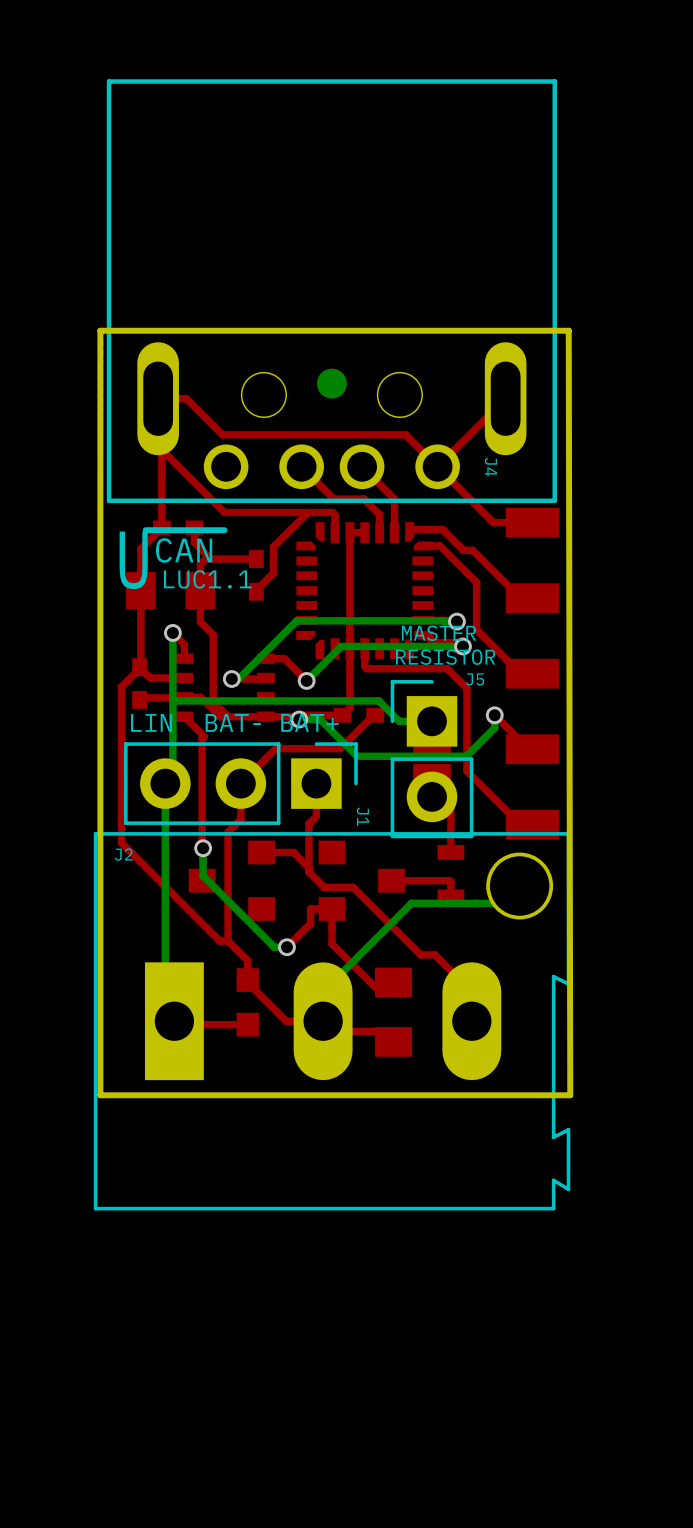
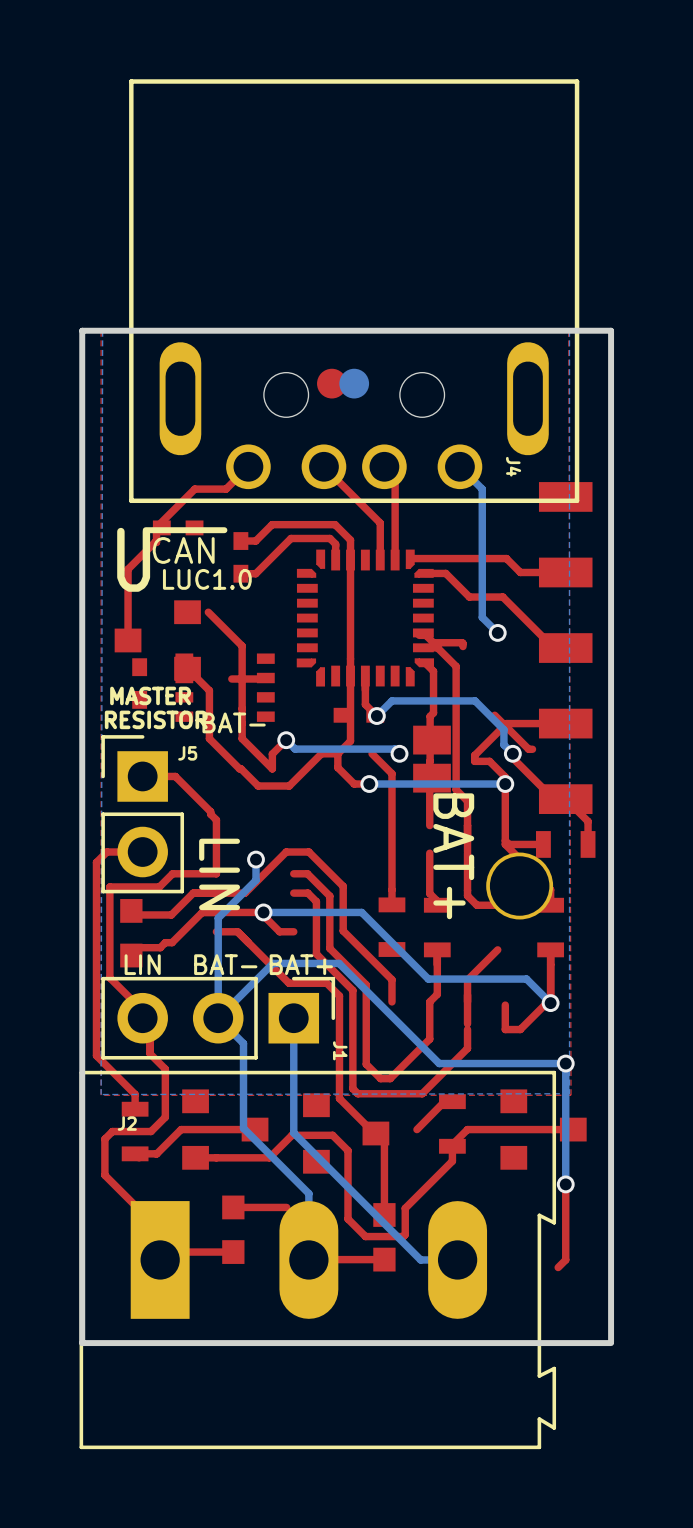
J4 position: (331, 291) -> (354, 291)
board edge: (568, 330) (570, 1095) (100, 1095) (100, 330) -> (611, 1343) (82, 1343) (82, 330) (100, 330)
board edge: none -> (568, 330) (611, 330) (611, 1341)
part position: (331, 383) -> (354, 383)
top track: (158, 398) (186, 398) (222, 434) (405, 434) (493, 522) (532, 522) -> none
top track: (158, 398) (158, 446) (224, 512) (332, 512) (335, 514) (335, 532) -> none
top track: (158, 398) (161, 402) (161, 527) (140, 548) (139, 667) -> none
top track: (505, 398) (437, 466) -> none
top track: none -> (248, 466) (226, 489) (194, 489) (156, 527) (156, 542) (128, 569) (128, 640)
top track: (301, 466) (333, 499) (363, 499) (379, 514) (379, 532) -> none
top track: none -> (323, 466) (380, 523) (380, 561)
top track: (362, 466) (394, 499) (394, 532) -> none
top track: none -> (384, 466) (395, 477) (395, 561)
bottom track: none -> (459, 466) (482, 489) (482, 617) (497, 632)
top track: (307, 512) (273, 546) (273, 573) (256, 591) -> none
part footprint: [296, 522, 434, 660] -> [296, 549, 435, 687]
top track: (194, 527) (194, 542) (210, 559) -> none
top track: (364, 532) (349, 532) (349, 707) (342, 715) (303, 715) (299, 719) (296, 716) (220, 716) (200, 697) (141, 697) (139, 699) -> none
top track: (407, 538) (409, 529) (442, 529) (463, 550) (472, 550) (520, 598) (532, 598) -> none
top track: none -> (240, 541) (255, 541) (272, 524) (335, 524) (350, 540) (350, 741) (337, 753)
top track: (416, 547) (440, 545) (476, 582) (476, 629) (520, 673) (532, 673) -> none
top track: none -> (410, 558) (506, 558) (520, 572) (565, 572)
top track: (256, 559) (205, 559) (200, 564) (200, 621) (213, 634) (213, 701) (228, 716) -> none
top track: none -> (335, 561) (335, 544) (330, 538) (291, 538) (255, 573) (240, 573)
top track: none -> (424, 573) (445, 573) (469, 597) (502, 597) (553, 648) (565, 648)
part position: (256, 575) -> (240, 557)
text: LUC1.1 (207, 579) -> LUC1.0 (207, 579)
part: (170, 590) -> none
top track: none -> (208, 612) (242, 646) (242, 738) (272, 768) (272, 754) (286, 740)
bottom track: (456, 621) (296, 620) (238, 679) (231, 679) -> none
via: (456, 621) -> none
top track: (172, 632) (184, 644) (184, 658) -> none
bottom track: (172, 632) (172, 776) (165, 783) (165, 1012) (174, 1021) -> none
via: (172, 632) -> none
via: none -> (497, 632)
text position: MASTER (439, 633) -> MASTER (150, 695)
part: none -> (157, 640)
bottom track: (462, 646) (341, 646) (306, 680) -> none
via: (462, 646) -> none
top track: none -> (421, 647) (437, 647) (456, 666) (456, 789) (467, 801) (467, 852)
top track: (364, 648) (364, 666) (367, 668) (447, 668) (466, 688) (466, 771) (520, 824) (532, 824) -> none
text position: RESISTOR (445, 657) -> RESISTOR (156, 719)
top track: (265, 658) (284, 658) (306, 680) -> none
top track: none -> (424, 662) (433, 671) (433, 712) (430, 716) (430, 761)
top track: (139, 667) (121, 686) (121, 842) (219, 941) (228, 941) -> none
top track: (139, 667) (150, 678) (184, 678) -> none
top track: none -> (187, 668) (209, 690) (209, 738) (258, 786) (289, 786) (321, 753) (337, 753)
part position: (532, 673) -> (565, 648)
top track: none -> (365, 674) (365, 704) (376, 716)
via: (231, 679) -> none
J5 name position: J5 (475, 679) -> J5 (187, 753)
via: (306, 680) -> none
bottom track: (172, 700) (378, 700) (399, 721) (432, 721) -> none
top track: (375, 715) (340, 748) (275, 748) (240, 783) (240, 819) (228, 832) (228, 941) -> none
bottom track: (494, 715) (494, 727) (466, 756) (357, 756) (320, 719) (299, 719) -> none
via: (494, 715) -> none
top track: (184, 716) (204, 736) (202, 738) (202, 880) -> none
bottom track: none -> (376, 716) (391, 700) (475, 700) (503, 729) (503, 744) (512, 753)
via: none -> (376, 716)
via position: (299, 719) -> (286, 740)
text: LIN (151, 722) -> none
text: BAT+ (309, 722) -> none
top track: none -> (577, 723) (506, 723) (474, 755) (474, 761) (489, 761) (505, 777) (505, 844) (550, 889) (550, 905)
bottom track: none -> (286, 740) (295, 749) (394, 749) (399, 753)
top track: none -> (337, 753) (337, 767) (354, 784) (369, 784)
top track: none -> (372, 753) (391, 773) (391, 904)
via: none -> (399, 753)
top track: none -> (512, 753) (512, 758) (553, 799) (565, 799) (588, 821) (588, 844)
via: none -> (512, 753)
J5 position: (432, 759) -> (142, 814)
top track: none -> (429, 761) (429, 825)
top track: none -> (142, 776) (175, 776) (210, 811) (216, 820) (216, 873) (172, 873) (159, 886) (109, 886) (109, 977) (150, 1018) (150, 1053) (165, 1069) (165, 1117) (151, 1131) (112, 1131) (104, 1139) (104, 1175) (160, 1230) (160, 1259) (168, 1252) (233, 1252)
J1 position: (240, 783) -> (218, 1018)
top track: (316, 783) (316, 816) (308, 823) (308, 872) (324, 887) (353, 887) (420, 954) (434, 954) (471, 991) (471, 1021) -> none
via: none -> (369, 784)
bottom track: none -> (505, 784) (369, 784)
via: none -> (505, 784)
top track: (444, 796) (450, 802) (450, 852) -> none
top track: none -> (505, 840) (509, 844) (543, 844)
part: none -> (565, 844)
text: none -> BAT+ (453, 856)
bottom track: (203, 848) (203, 875) (274, 947) (286, 947) -> none
via: (203, 848) -> none
top track: none -> (142, 852) (106, 852) (96, 862) (96, 1055) (135, 1094) (135, 1109)
top track: (261, 852) (293, 852) (308, 867) -> none
top track: none -> (429, 853) (429, 893) (437, 901) (437, 905)
top track: none -> (467, 853) (467, 895) (476, 905) (497, 905)
J2 name position: J2 (123, 854) -> J2 (127, 1123)
bottom track: none -> (256, 859) (256, 880) (218, 918) (218, 1018)
via: none -> (256, 859)
top track: none -> (293, 873) (307, 873) (329, 896) (329, 948) (366, 984) (366, 1064) (380, 1078) (390, 1078) (429, 1039) (429, 1001) (437, 994) (437, 949)
part: (450, 874) -> none
text: none -> LIN (219, 874)
part: (231, 880) -> none
part: (361, 880) -> none
top track: (391, 880) (449, 880) (450, 896) -> none
top track: none -> (293, 893) (307, 893) (316, 901) (316, 953) (352, 990) (352, 1088) (357, 1093) (422, 1093) (467, 1048) (467, 1029)
bottom track: (523, 903) (411, 903) (323, 991) (323, 1021) -> none
top track: none -> (127, 911) (131, 914) (171, 914) (193, 893) (245, 893) (286, 852) (308, 852) (343, 886) (343, 930) (391, 979) (391, 1001)
bottom track: none -> (263, 912) (361, 912) (428, 979) (526, 979) (550, 1003)
part: none -> (391, 927)
part: none -> (437, 927)
part: none -> (550, 927)
top track: none -> (216, 931) (237, 931) (289, 983) (326, 983) (339, 995) (339, 1098) (384, 1142) (384, 1214)
top track: none -> (293, 931) (279, 931) (260, 912) (202, 912) (172, 942) (165, 942) (160, 947) (131, 947)
part: none -> (131, 933)
top track: (228, 941) (247, 960) (247, 982) (286, 1021) (323, 1021) (333, 1031) (393, 1031) -> none
top track: (286, 947) (310, 923) (310, 908) (332, 908) (332, 943) (374, 986) (393, 986) -> none
via position: (286, 947) -> (263, 912)
top track: none -> (497, 949) (467, 980) (467, 1023)
top track: none -> (550, 949) (550, 999) (520, 1029) (505, 1029) (505, 1005)
text: none -> LIN (142, 964)
text: none -> BAT- (225, 964)
text: none -> BAT+ (301, 964)
part: (247, 1002) -> none
via: none -> (550, 1003)
part: (393, 1012) -> none
bottom track: none -> (218, 1018) (243, 1043) (243, 1128) (308, 1193) (308, 1259)
bottom track: none -> (218, 1018) (272, 963) (339, 963) (439, 1063) (565, 1063) (565, 1184)
bottom track: none -> (293, 1018) (293, 1133) (420, 1259) (457, 1259)
top track: (174, 1021) (177, 1024) (247, 1024) -> none
J2 position: (332, 1021) -> (317, 1259)
via: none -> (565, 1063)
top track: none -> (444, 1101) (416, 1129)
part: none -> (452, 1123)
part: none -> (225, 1129)
top track: none -> (255, 1129) (181, 1129) (156, 1153) (135, 1153) (139, 1157)
part: none -> (543, 1129)
top track: none -> (573, 1129) (467, 1129) (450, 1146) (444, 1146)
part: none -> (135, 1131)
part: none -> (346, 1133)
top track: none -> (452, 1146) (452, 1161) (405, 1208) (405, 1234) (403, 1236) (365, 1236) (347, 1219) (347, 1150) (332, 1135) (291, 1135) (269, 1157) (195, 1157)
top track: none -> (565, 1184) (565, 1259) (558, 1267)
via: none -> (565, 1184)
top track: none -> (286, 1207) (233, 1207)
part: none -> (233, 1229)
part: none -> (384, 1237)
top track: none -> (384, 1259) (309, 1259)

